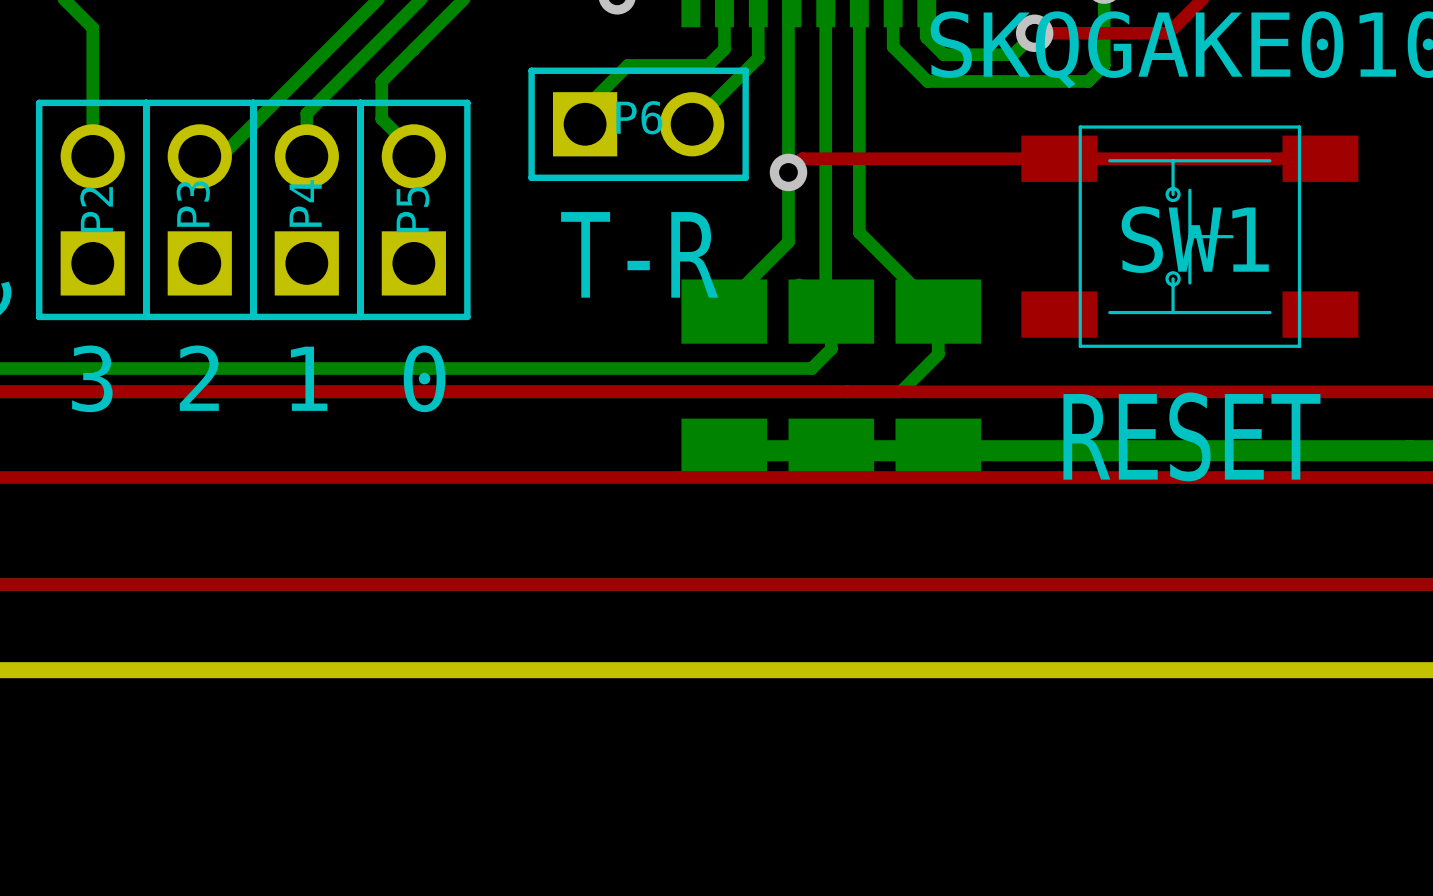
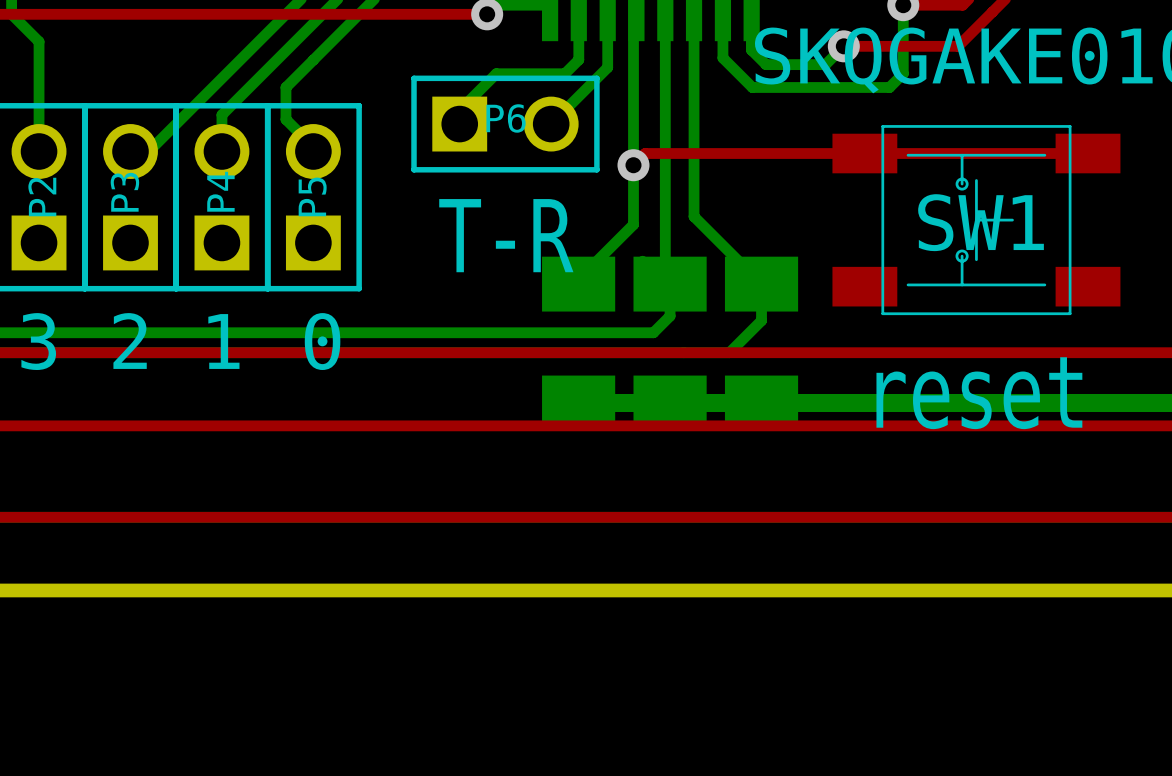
text: RESET (1191, 436) -> reset (979, 393)

